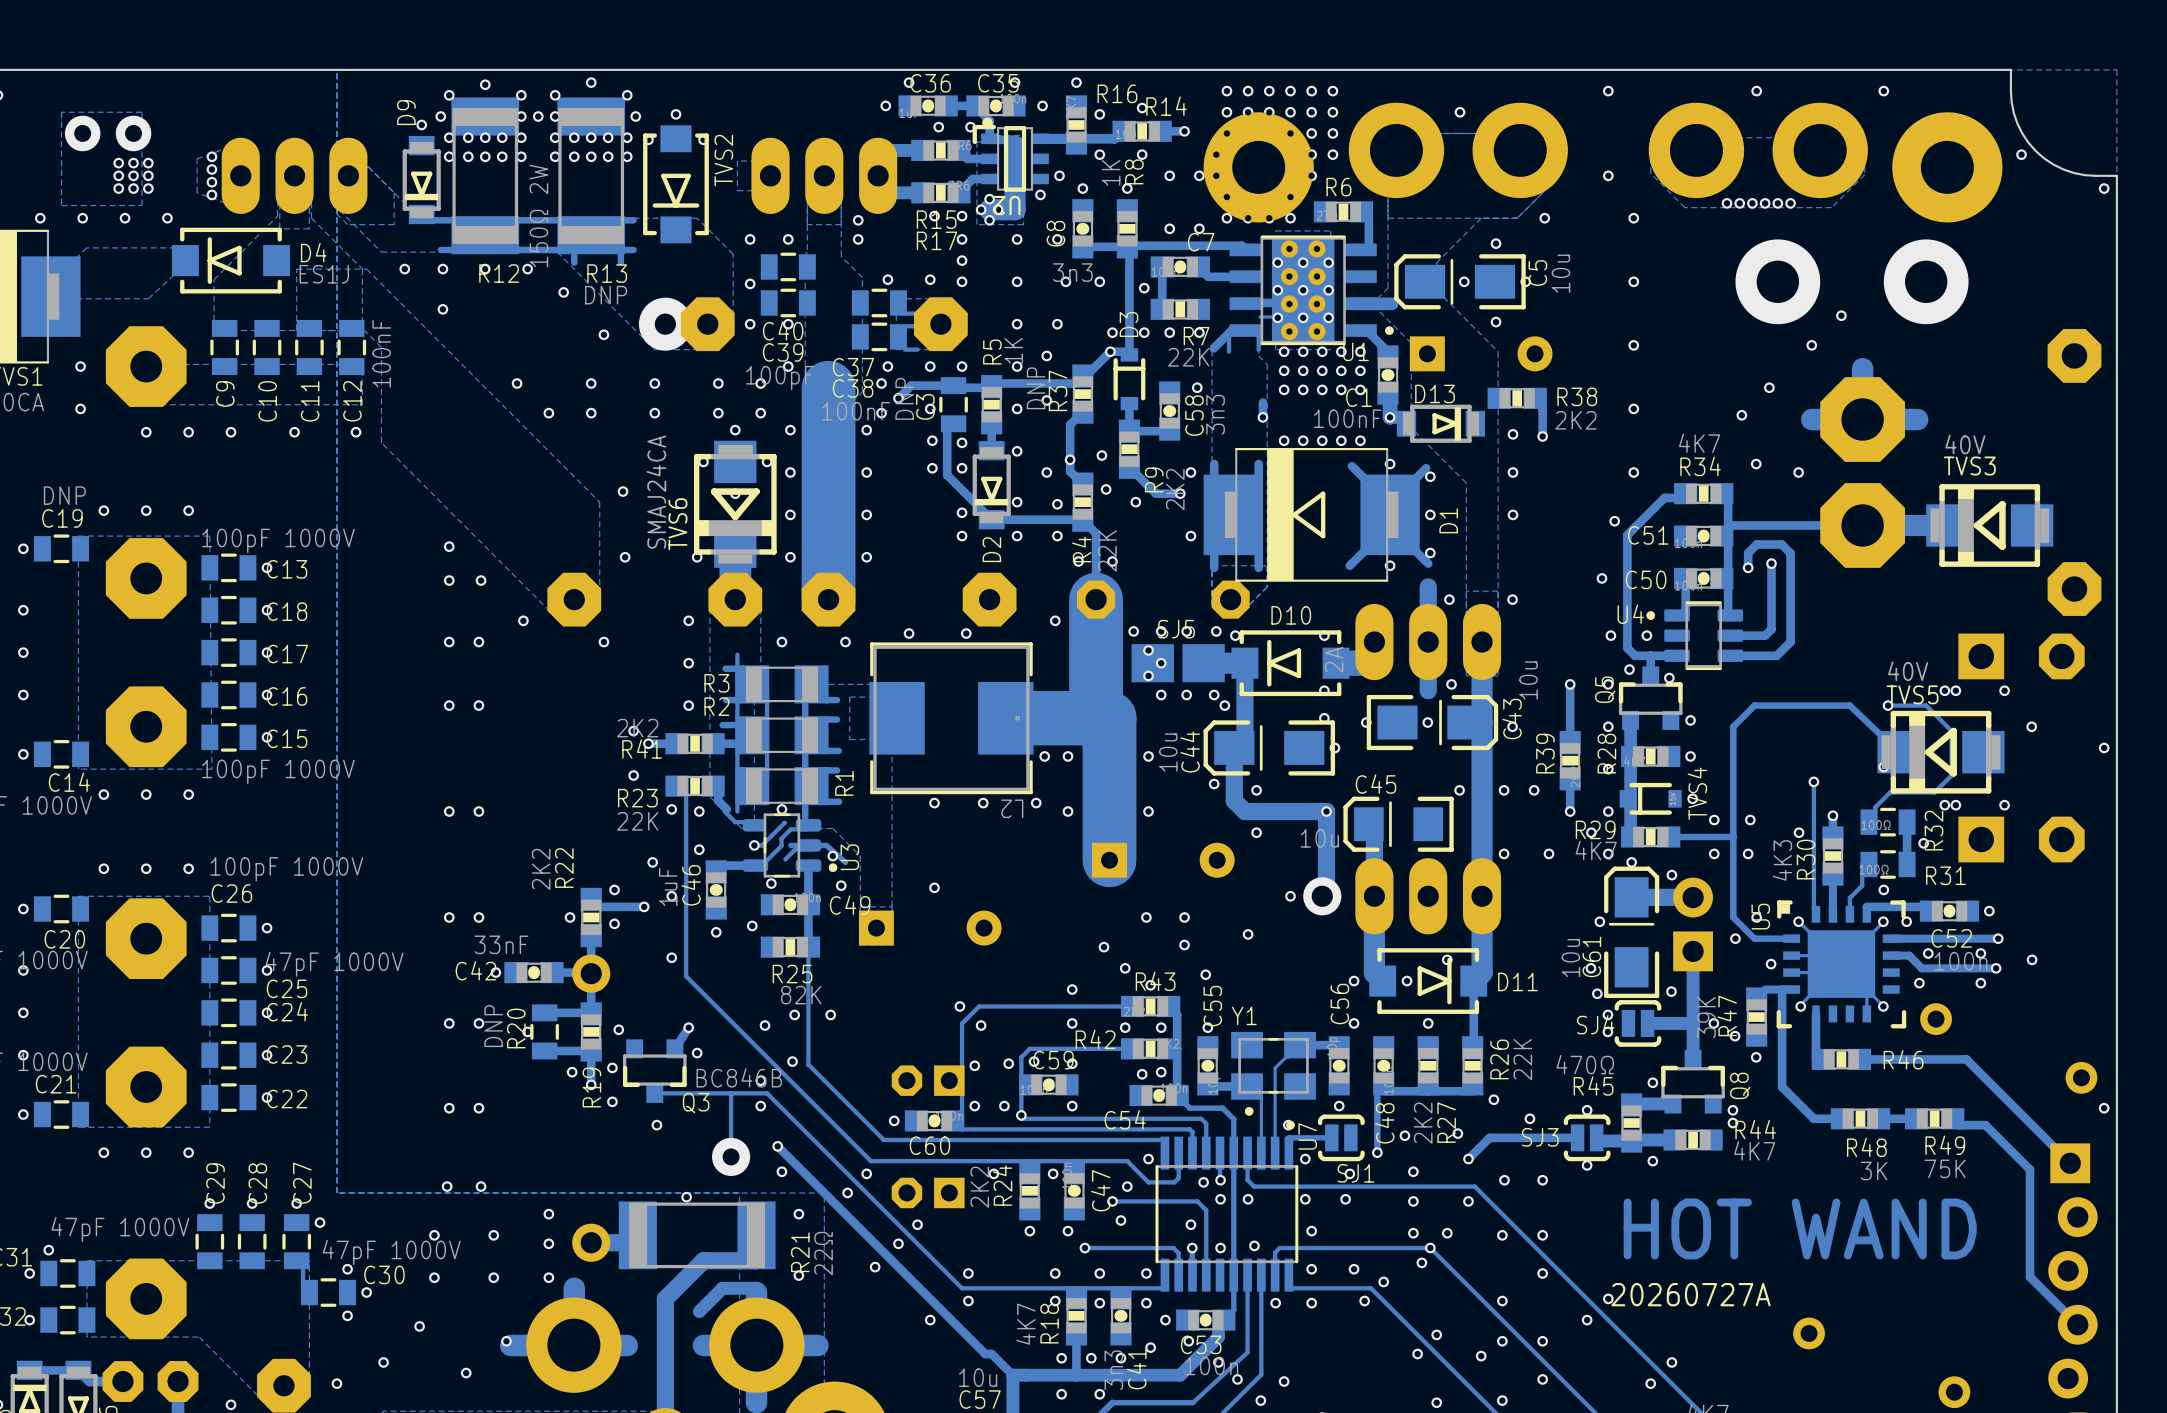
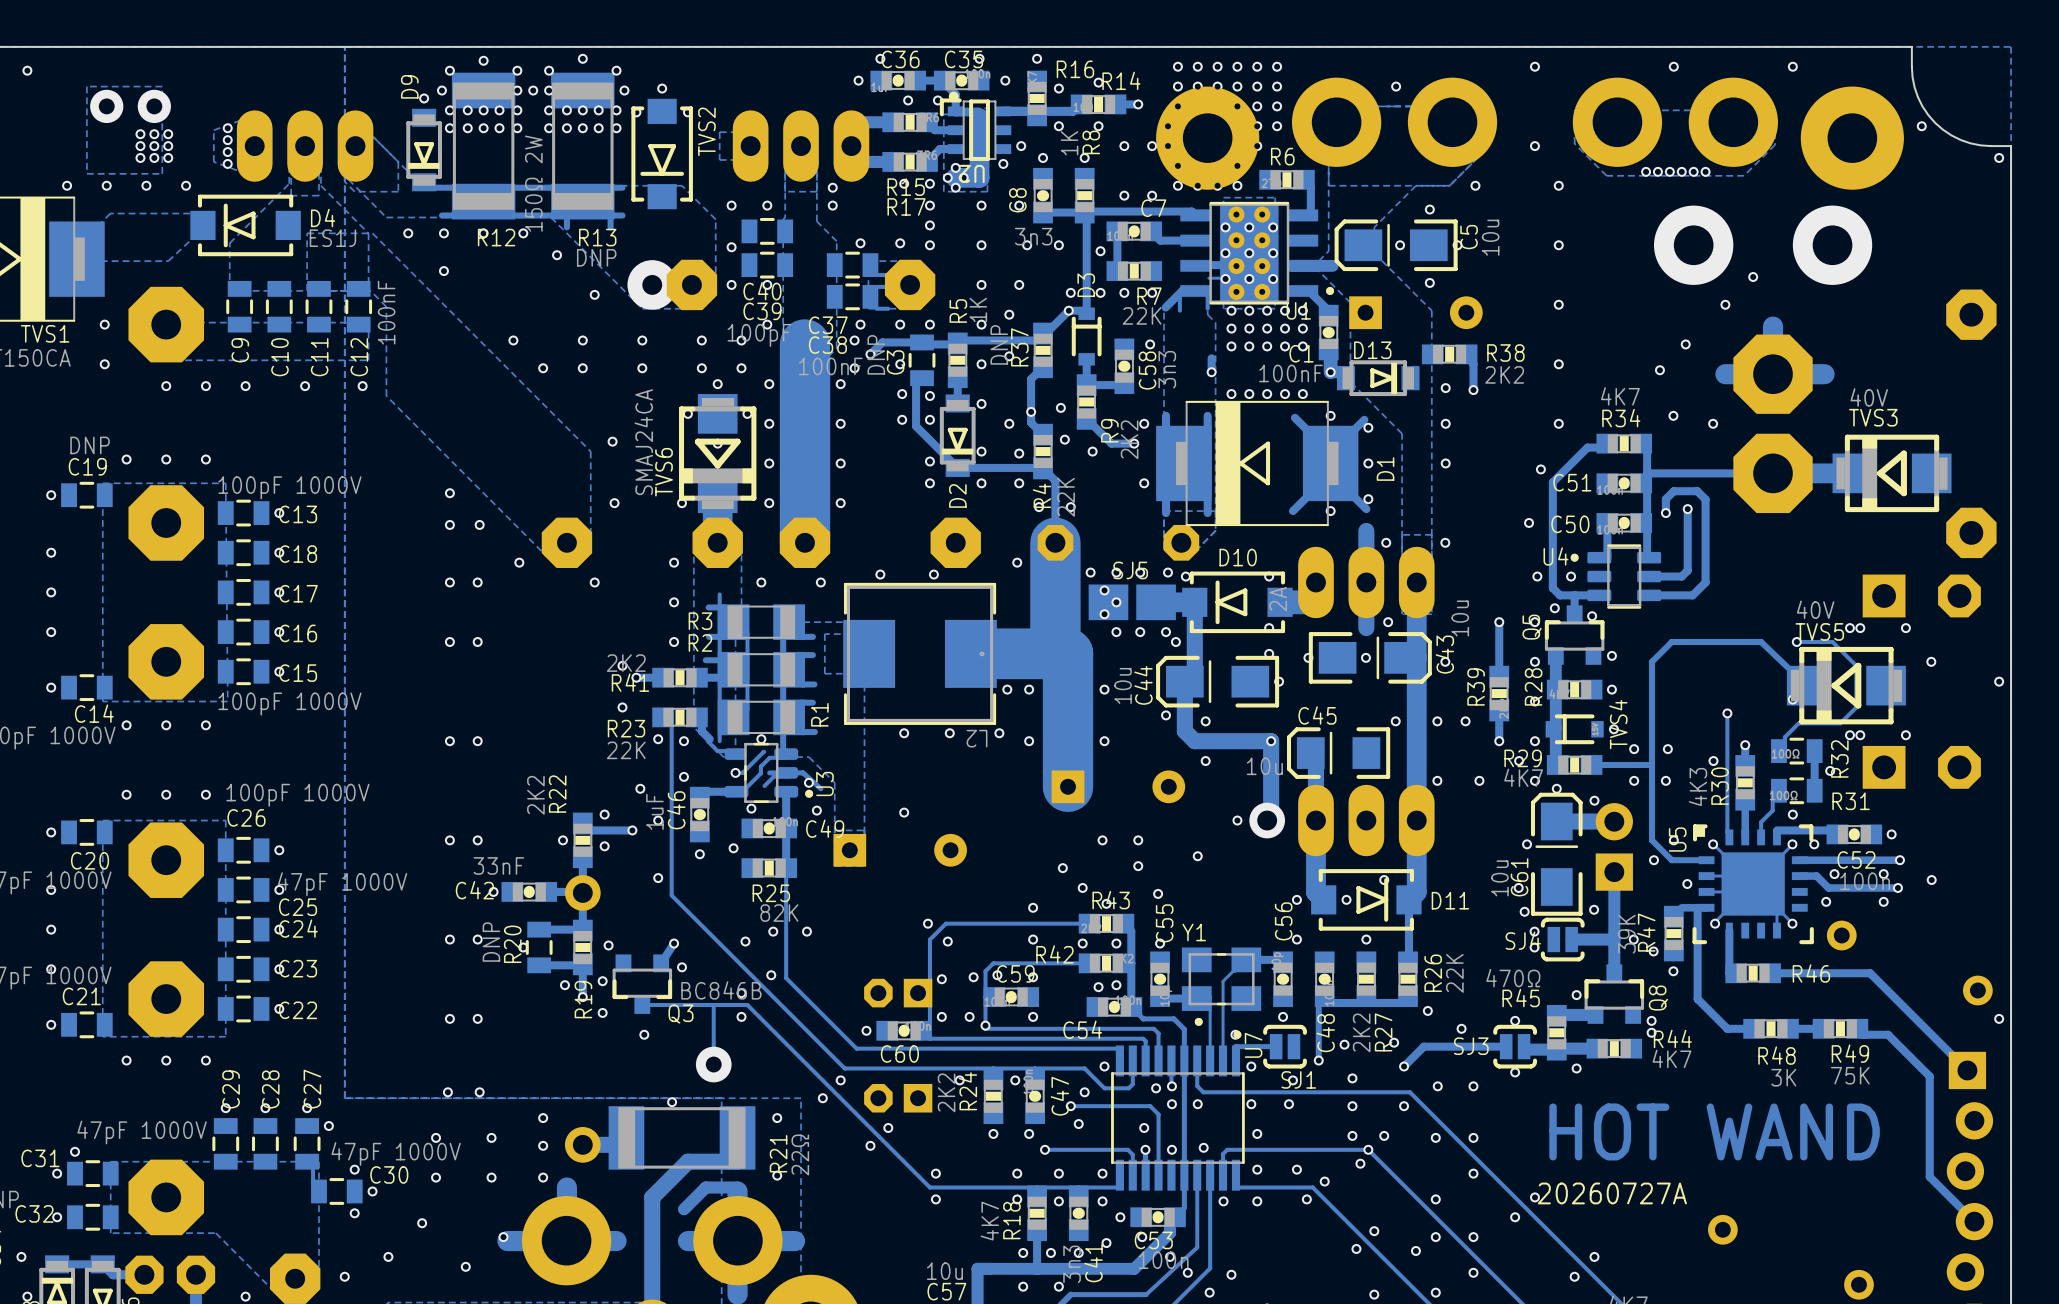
track: (777, 1146) (985, 1353) (991, 1353) (1012, 1375) -> none
via: (777, 1146) -> none
via: (781, 1171) -> none
via: (875, 1267) -> none
via: (930, 1320) -> none

